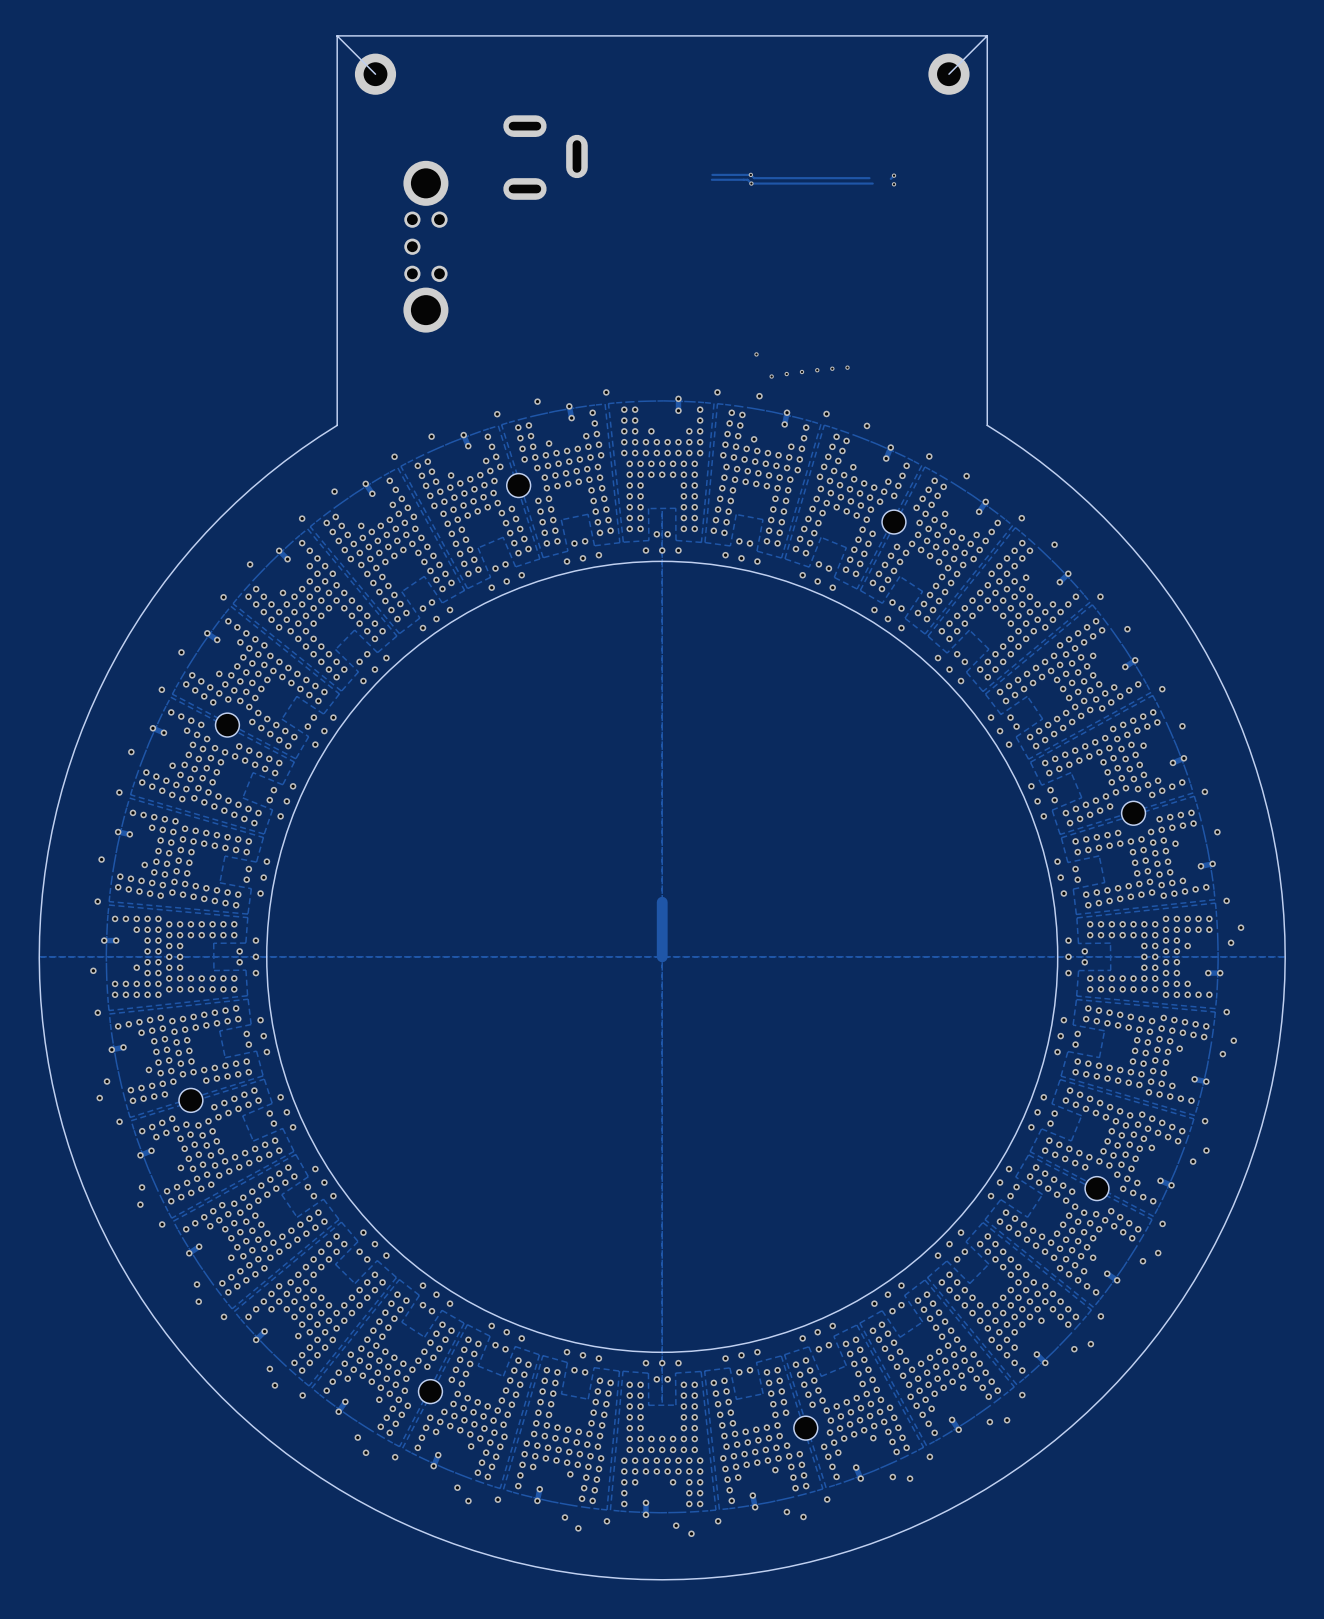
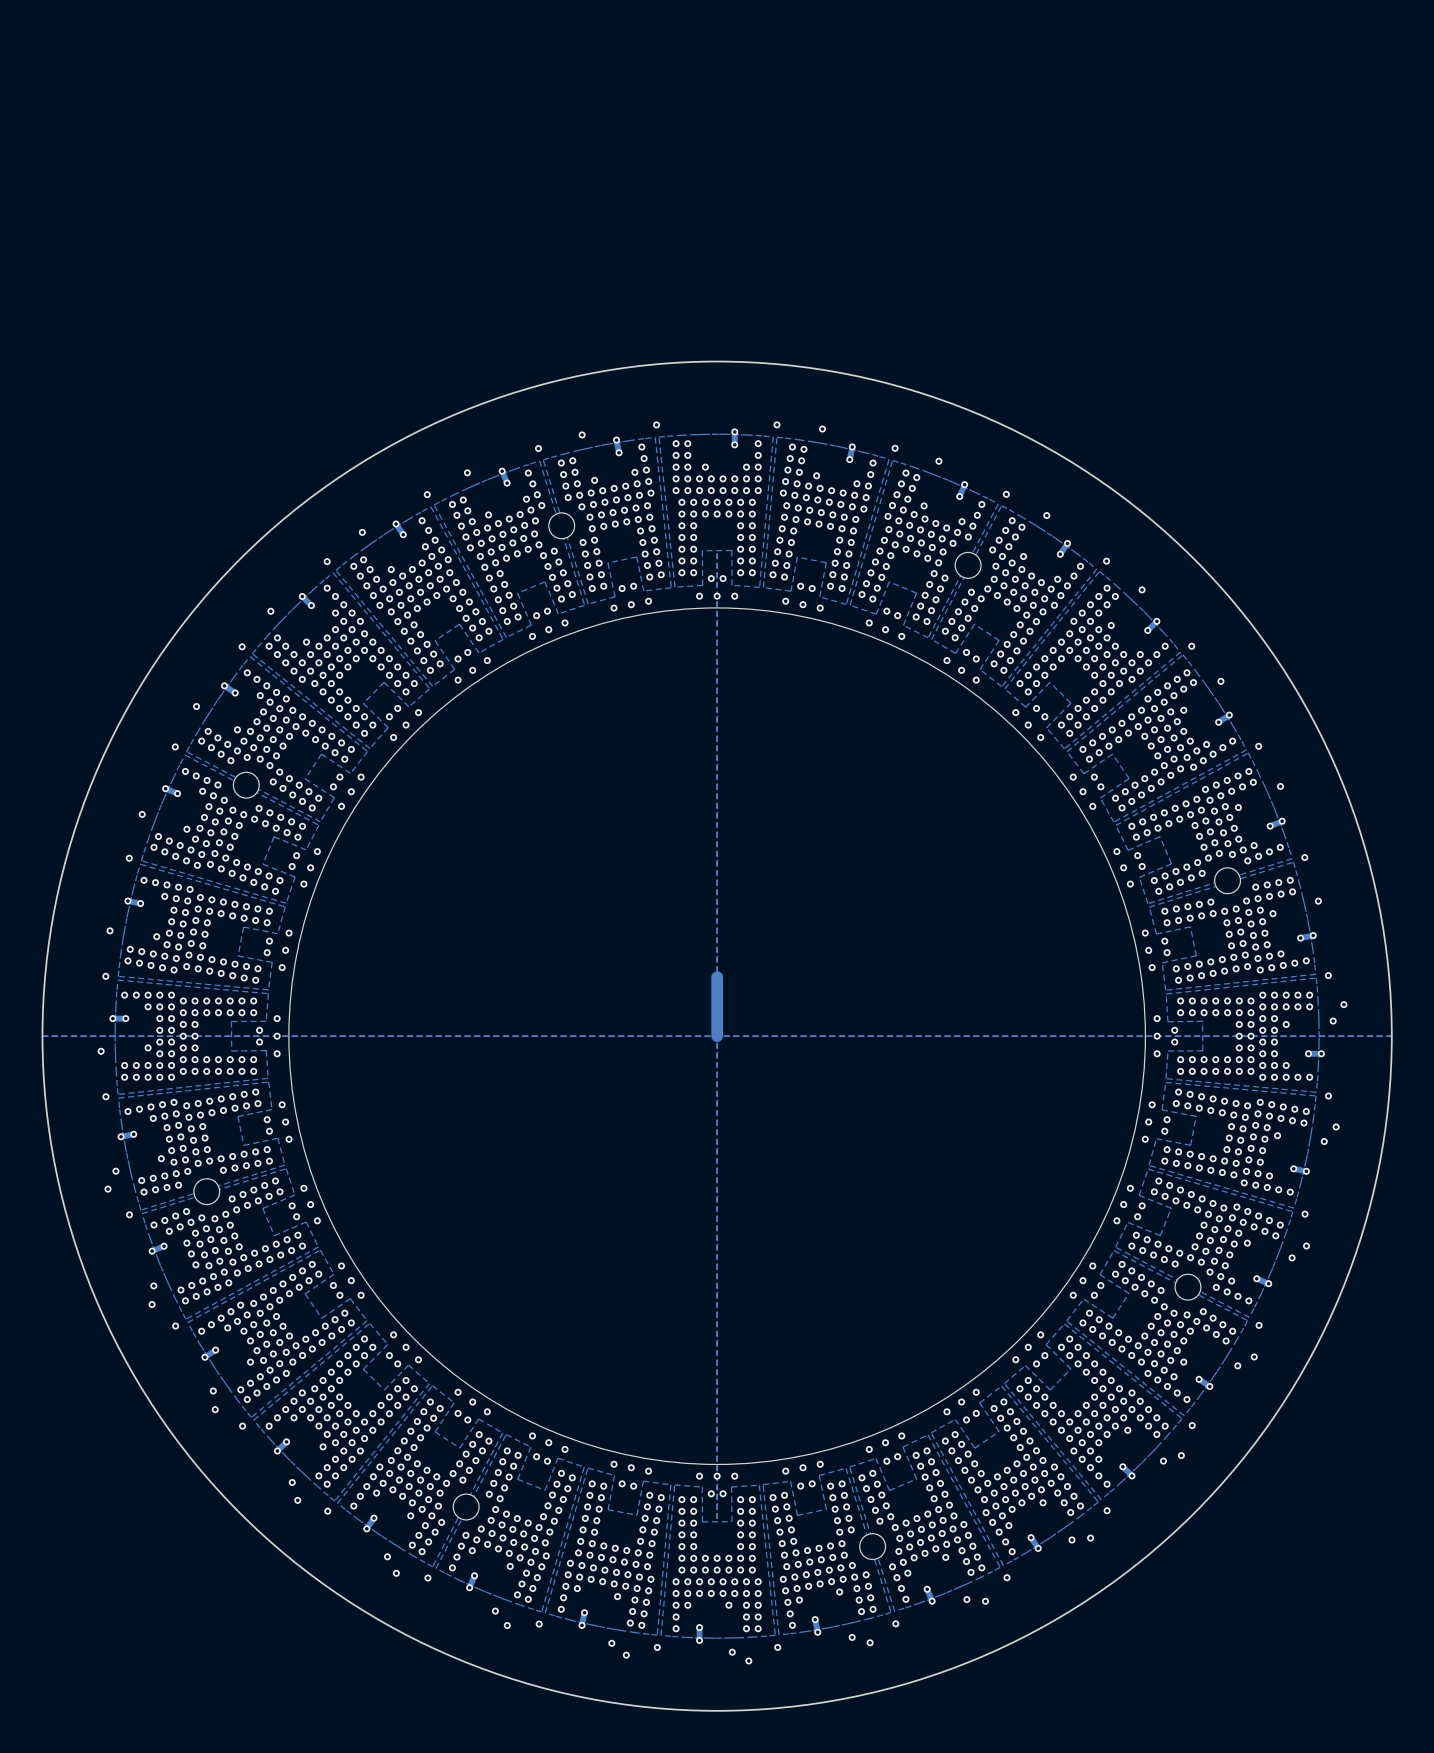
board edge: (337, 35) (375, 74) -> none
board edge: (987, 35) (987, 425) (1039, 461) (1072, 488) (1132, 548) (1159, 581) (1195, 634) (1234, 709) (1256, 769) (1267, 810) (1282, 894) (1284, 979) (1279, 1042) (1271, 1084) (1255, 1146) (1241, 1186) (1215, 1244) (1194, 1281) (1158, 1333) (1131, 1366) (1087, 1412) (1055, 1440) (1003, 1477) (967, 1499) (910, 1528) (870, 1543) (809, 1562) (767, 1570) (725, 1576) (662, 1579) (619, 1578) (556, 1570) (514, 1562) (453, 1543) (394, 1519) (357, 1499) (303, 1465) (269, 1440) (237, 1412) (193, 1366) (153, 1316) (130, 1281) (99, 1225) (82, 1186) (62, 1125) (52, 1084) (42, 1021) (39, 979) (42, 894) (48, 852) (62, 789) (90, 709) (129, 634) (165, 581) (191, 548) (235, 502) (267, 474) (337, 425) (337, 35) -> none
board edge: (987, 35) (948, 74) -> none
board edge: (987, 35) (337, 35) -> none
part: (375, 74) -> none
part: (948, 74) -> none
part: (545, 157) -> none
track: (712, 174) (750, 174) (754, 178) (869, 178) -> none
via: (750, 174) -> none
track: (894, 175) (890, 178) -> none
via: (894, 175) -> none
track: (711, 179) (747, 179) (751, 183) (872, 183) -> none
via: (751, 183) -> none
via: (894, 184) -> none
part: (425, 246) -> none
round board edge: none -> [41, 360, 1393, 1712]
via: (756, 354) -> none
via: (847, 367) -> none
via: (832, 368) -> none
via: (817, 370) -> none
via: (801, 371) -> none
via: (786, 374) -> none
via: (771, 376) -> none
via: none -> (186, 1243)
via: none -> (191, 1253)

